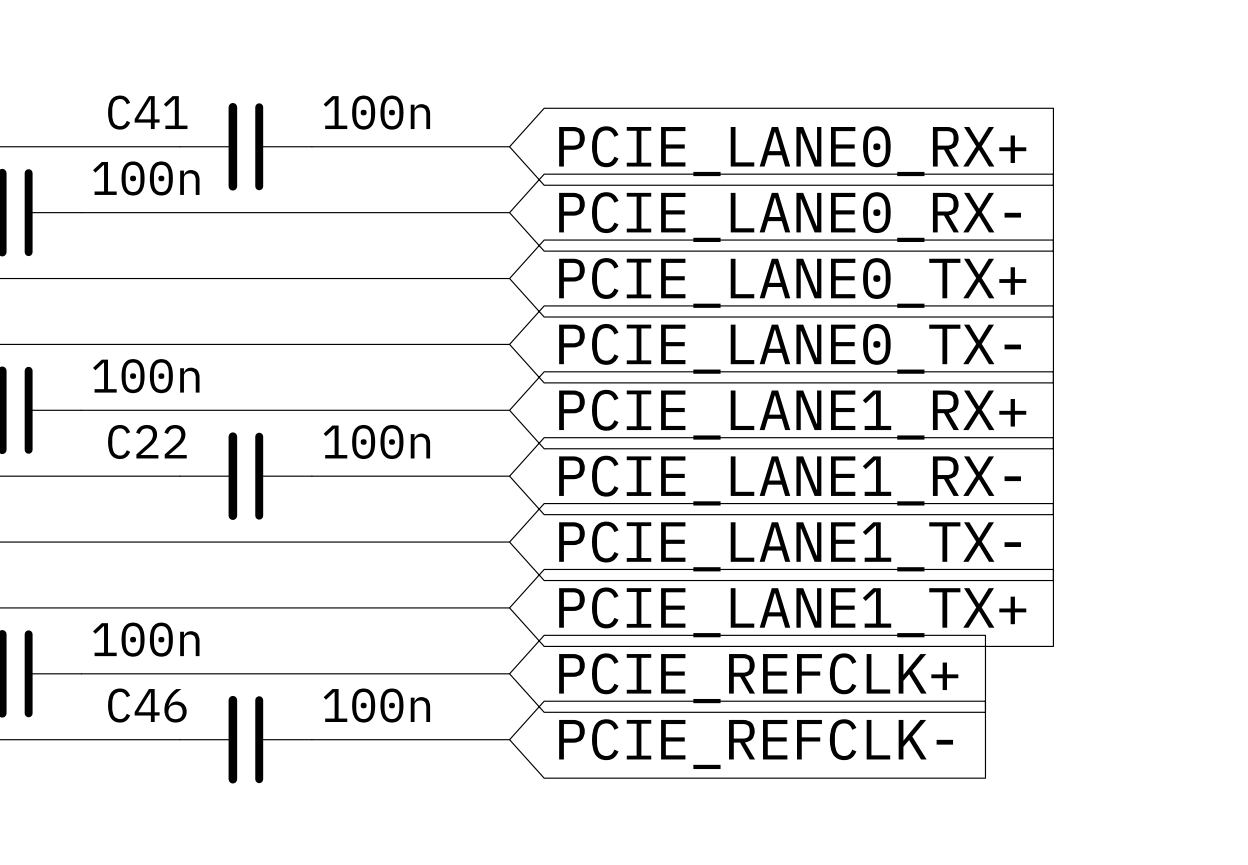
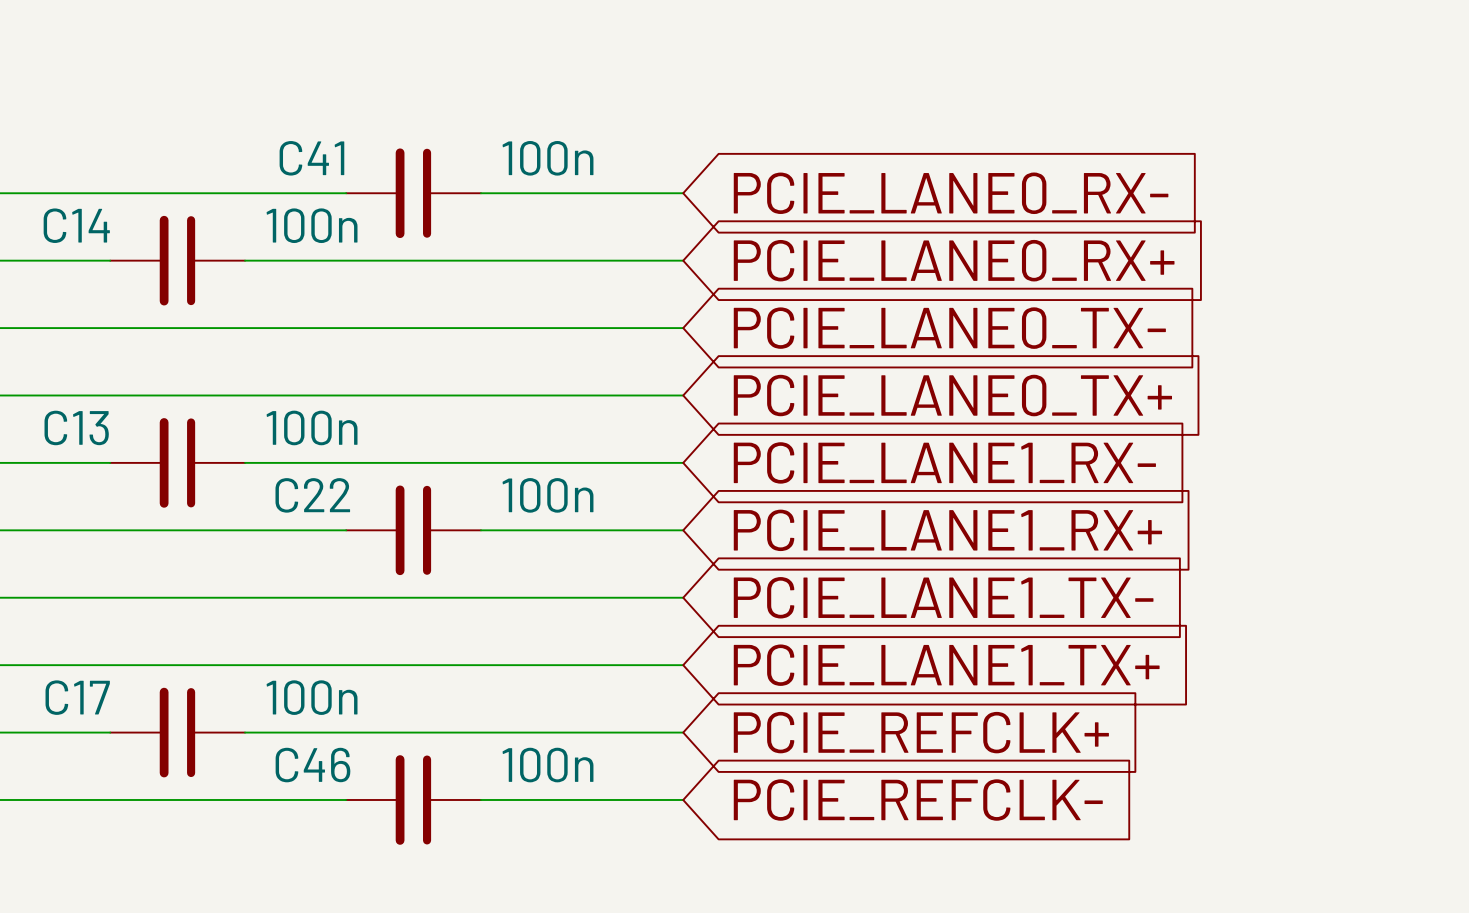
global label: PCIE_LANE0_RX+ (792, 151) -> PCIE_LANE0_RX- (951, 193)
global label: PCIE_LANE0_RX- (790, 217) -> PCIE_LANE0_RX+ (954, 260)
global label: PCIE_LANE0_TX+ (792, 282) -> PCIE_LANE0_TX- (949, 328)
global label: PCIE_LANE0_TX- (790, 348) -> PCIE_LANE0_TX+ (952, 395)
global label: PCIE_LANE1_RX+ (792, 414) -> PCIE_LANE1_RX- (944, 462)
global label: PCIE_LANE1_RX- (790, 480) -> PCIE_LANE1_RX+ (947, 530)

